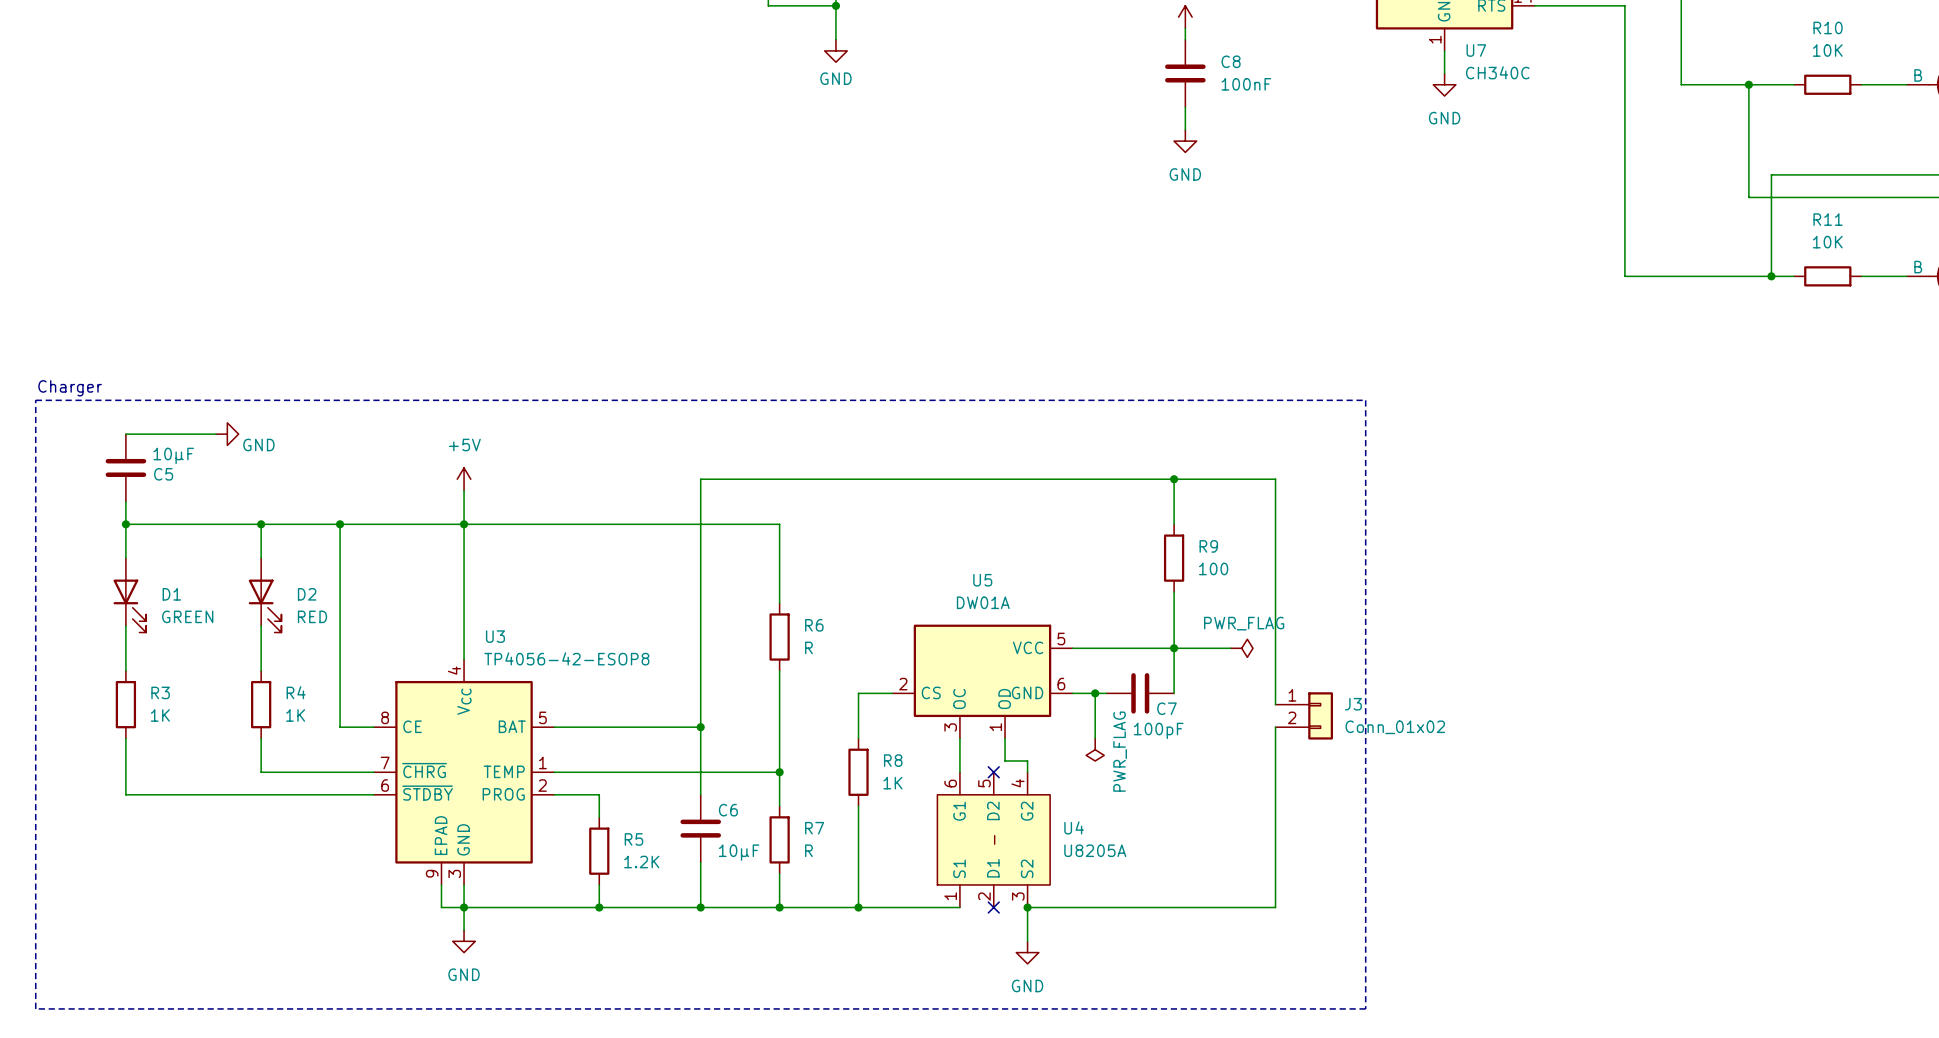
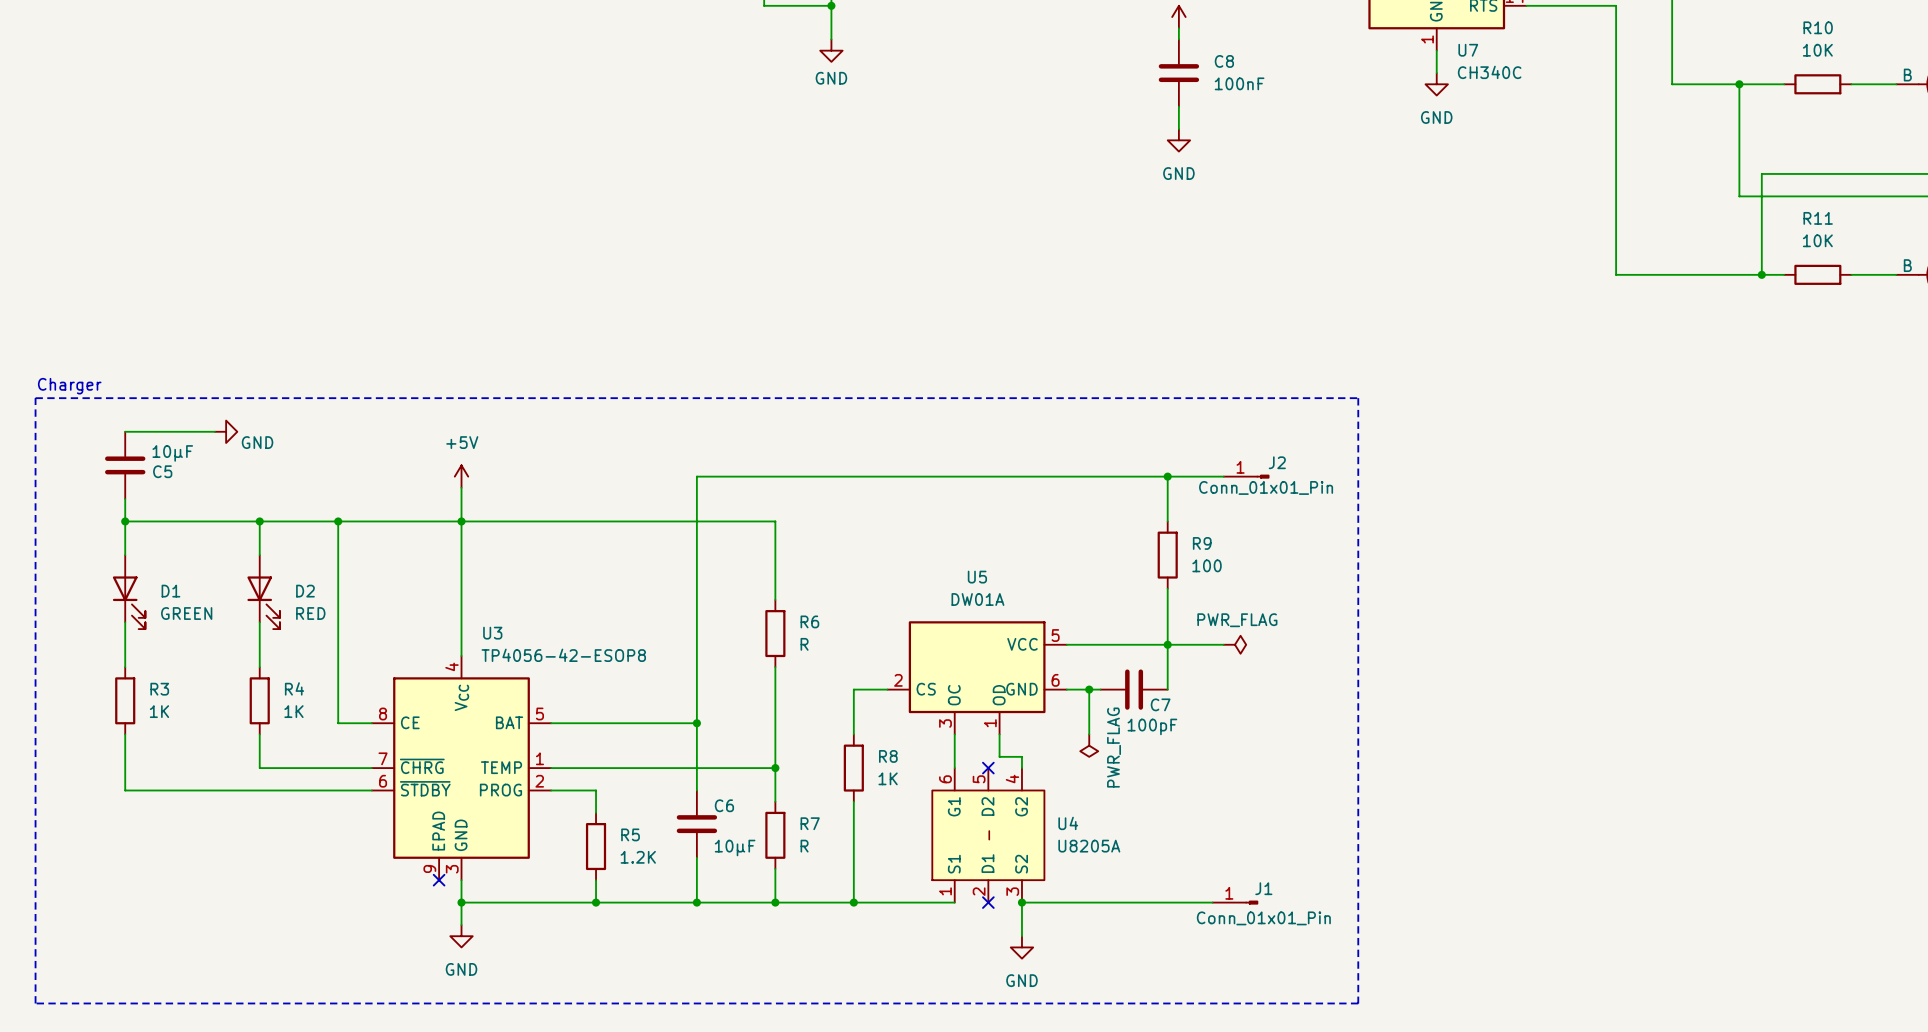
wire: (1230, 479) (1275, 479) (1275, 704) -> none
J2: none -> Conn_01x01_Pin (1246, 476)
J3: Conn_01x02 (1304, 715) -> none
wire: (1275, 727) (1275, 907) (1219, 907) -> none
wire: (441, 884) (441, 907) (464, 907) -> none
no-connect mark: none -> (439, 880)
J1: none -> Conn_01x01_Pin (1235, 902)

